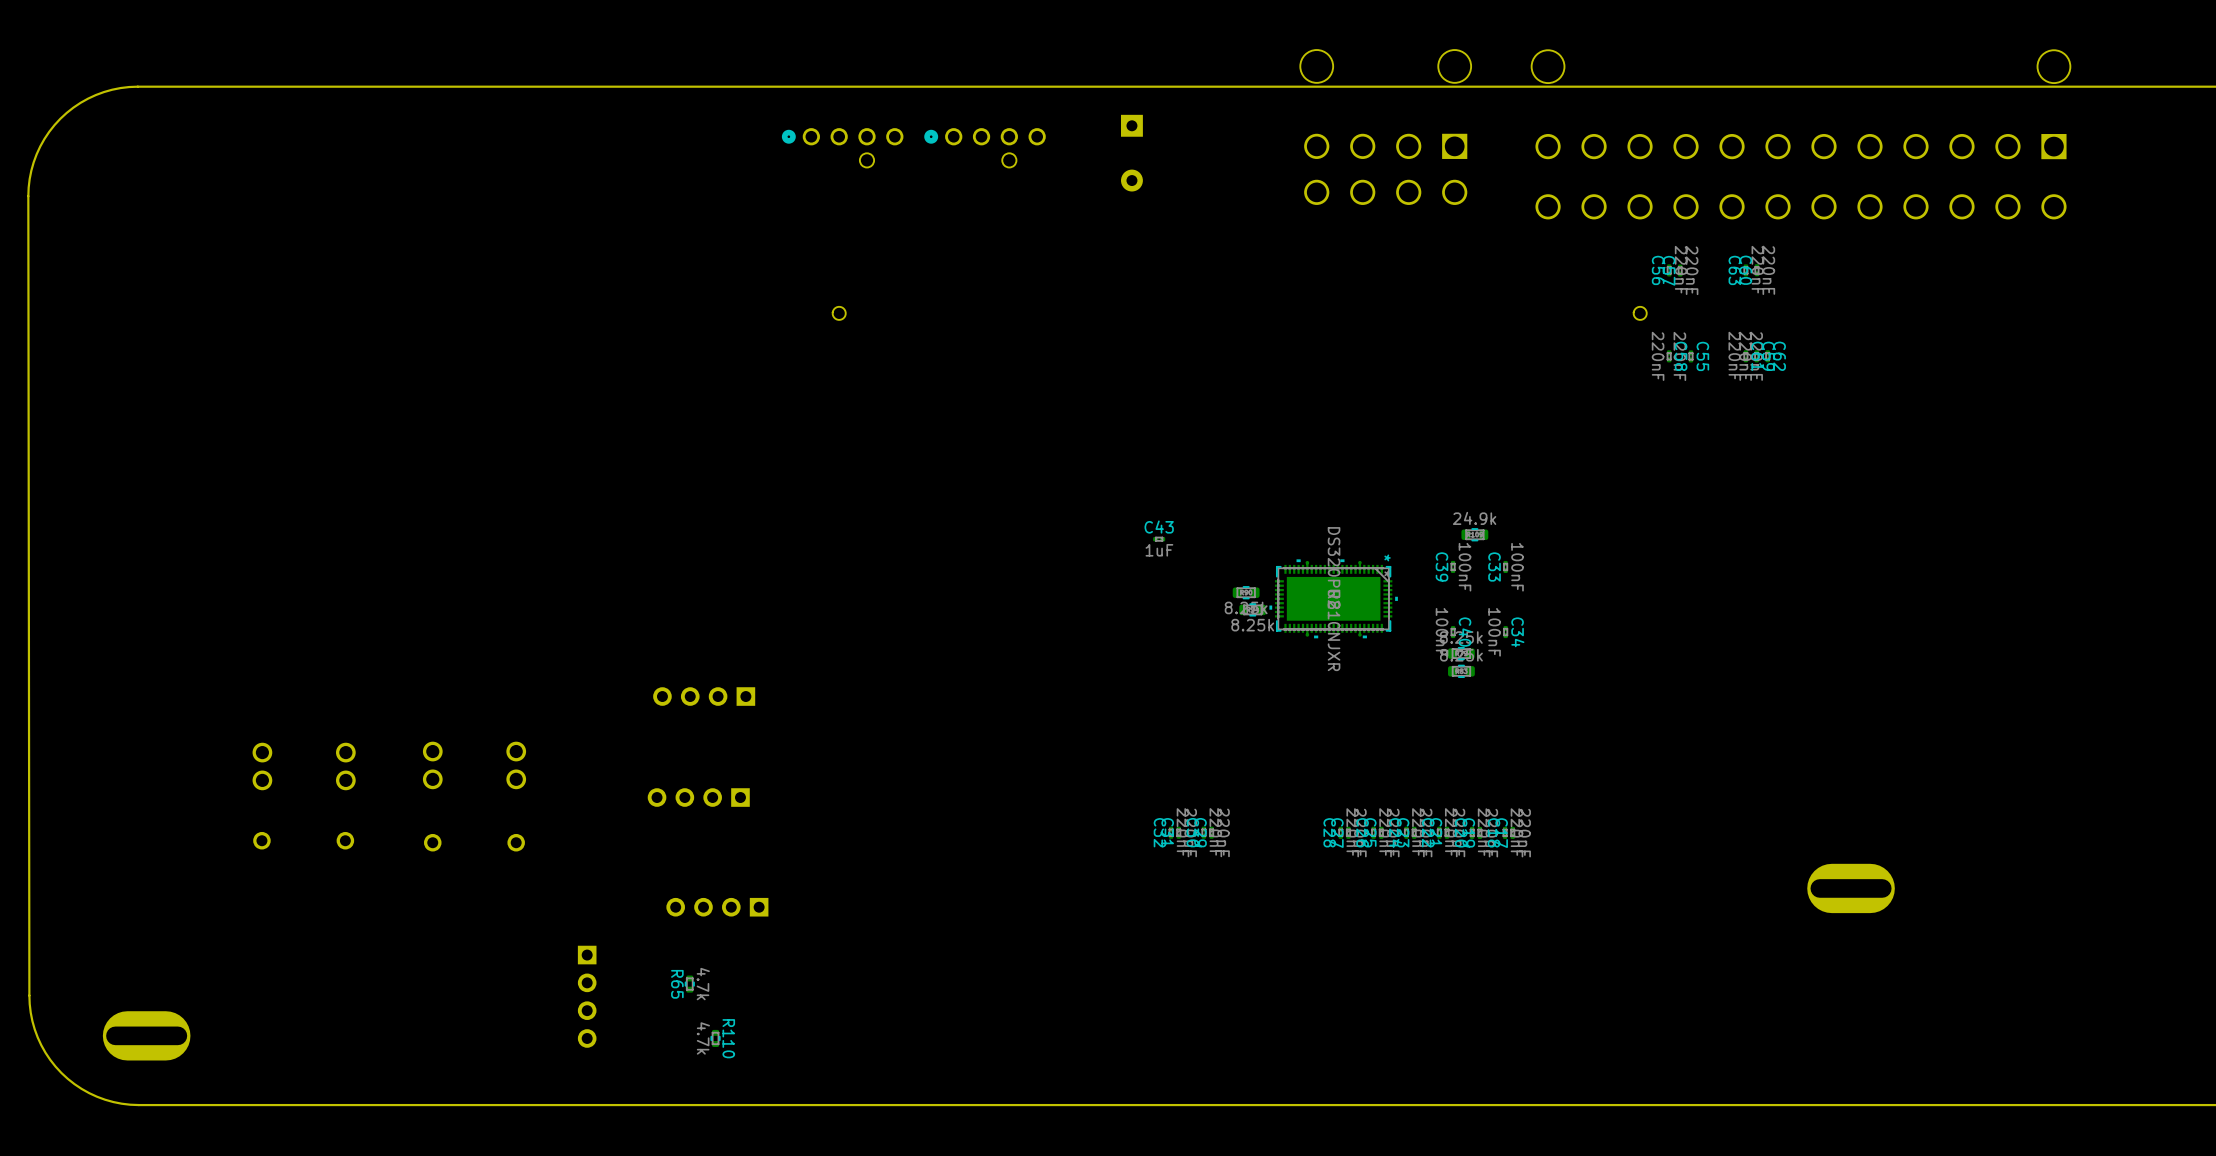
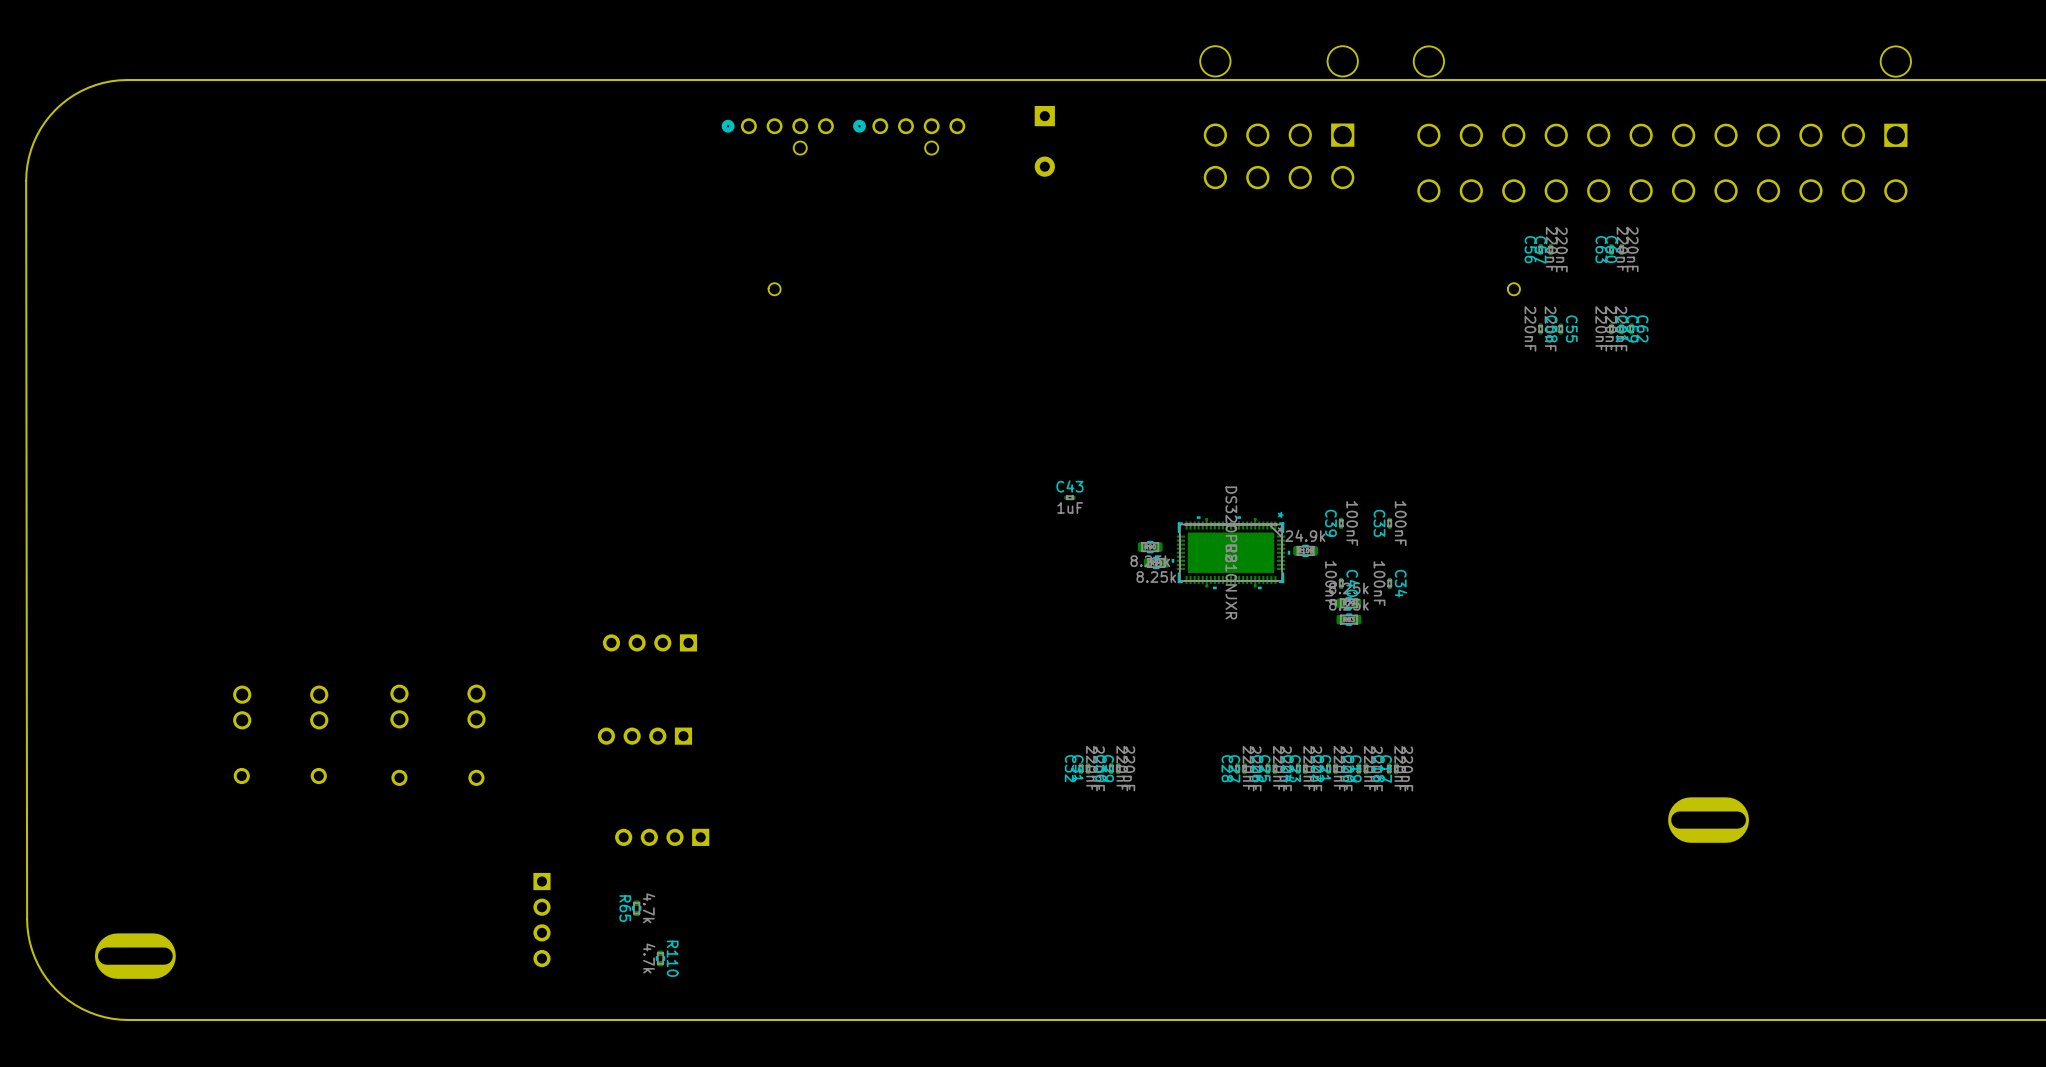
part position: (1474, 534) -> (1305, 550)

